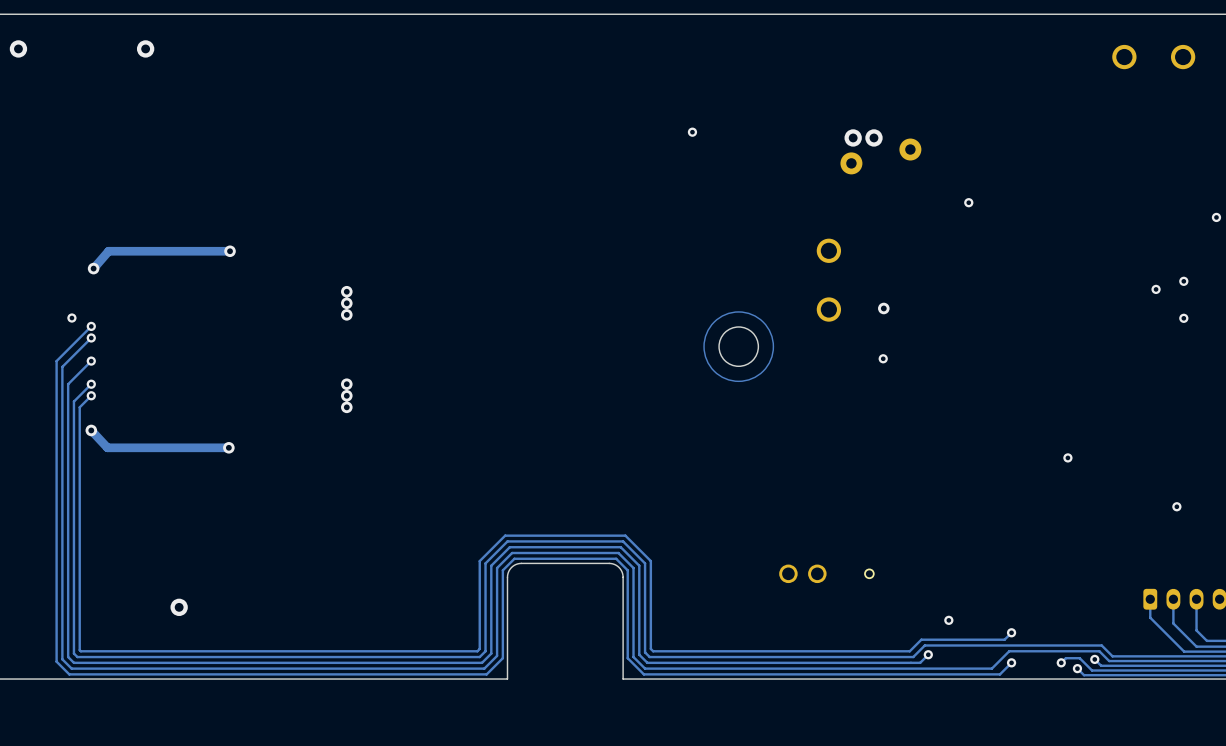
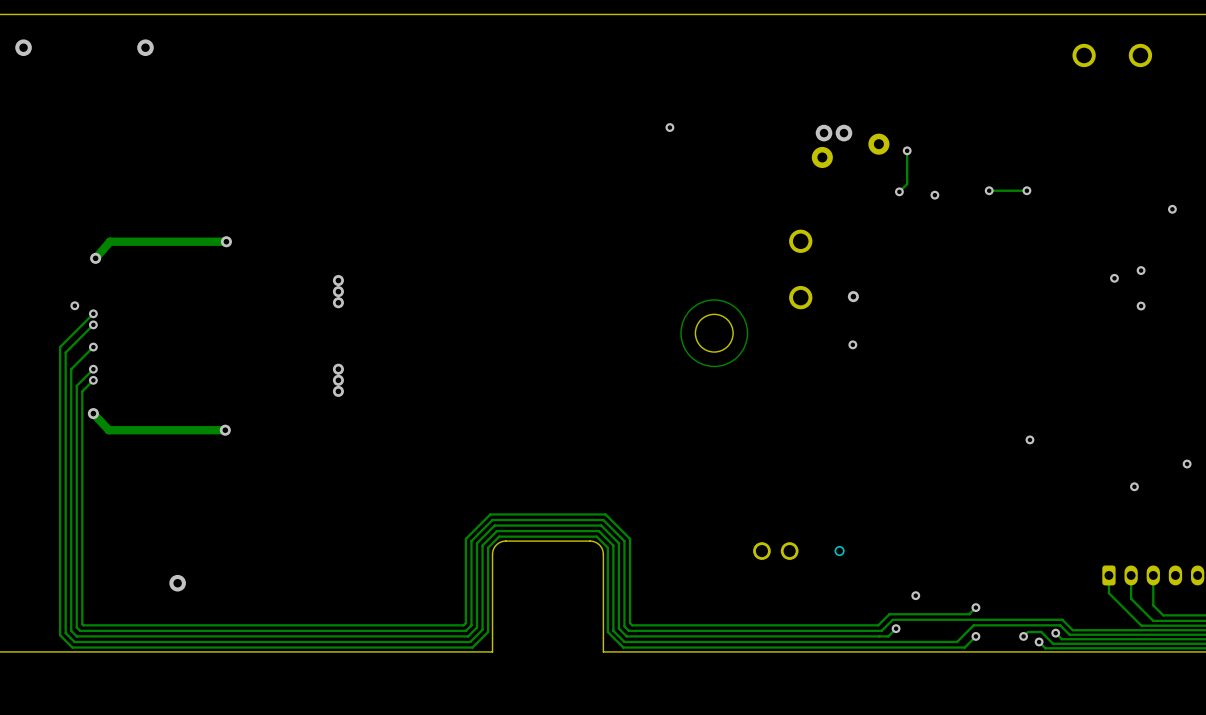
track: none -> (907, 150) (907, 184) (899, 191)
via: none -> (907, 150)
via: none -> (989, 190)
track: none -> (1026, 190) (989, 190)
via: none -> (1026, 190)
via: none -> (899, 191)

